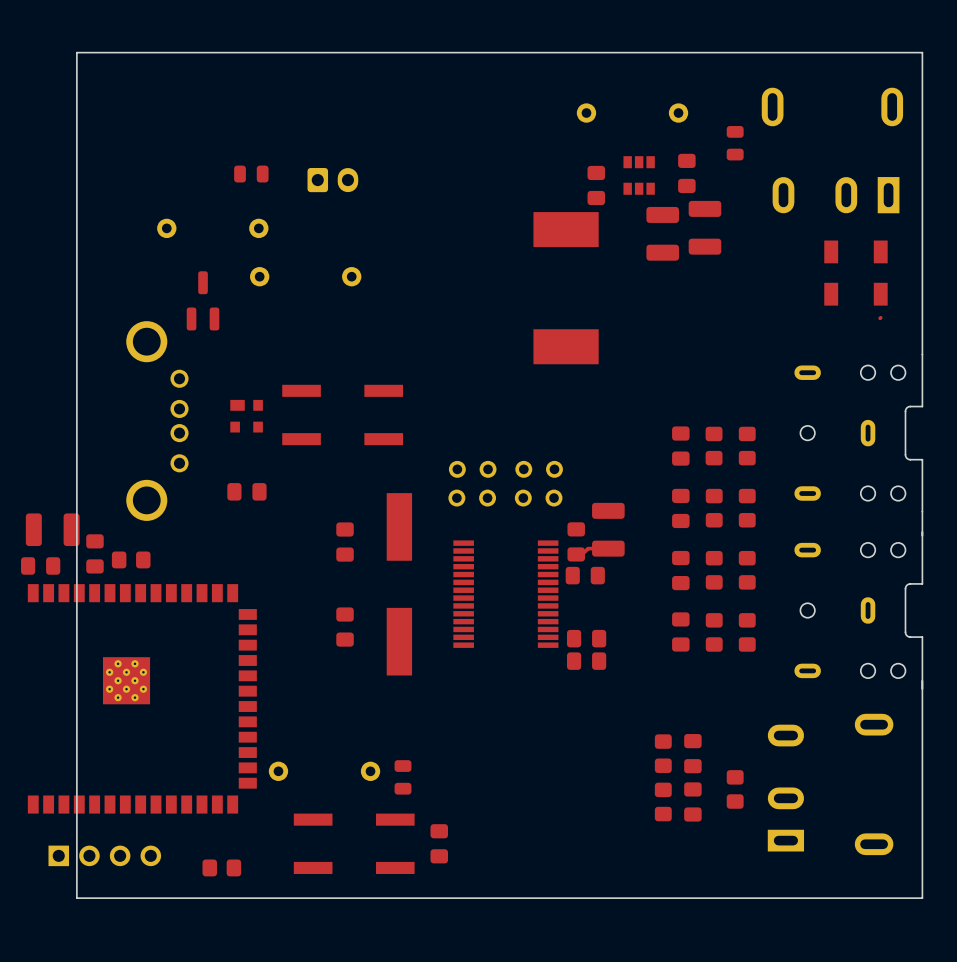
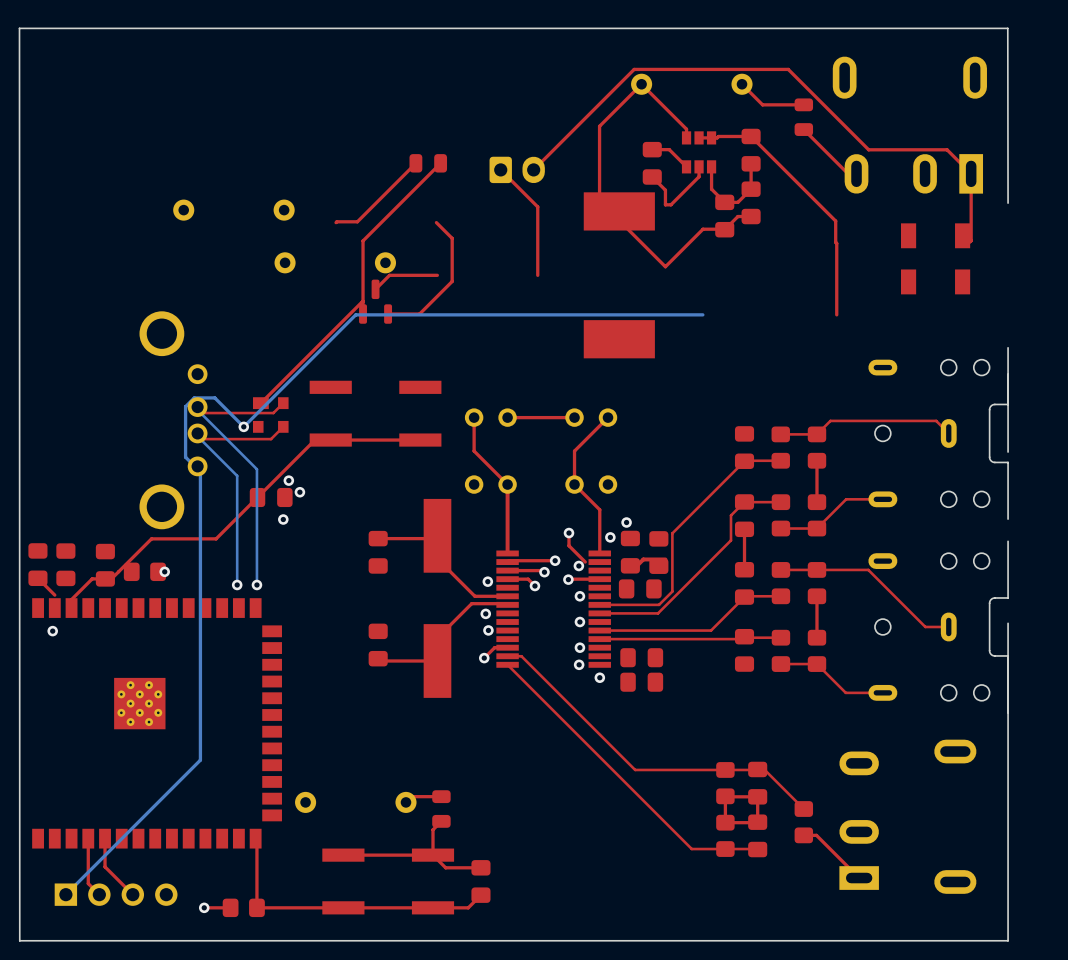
top track: none -> (742, 84) (762, 104) (803, 104)
top track: none -> (803, 129) (848, 173) (856, 173)
top track: none -> (686, 137) (686, 129) (641, 84) (599, 126) (599, 200) (665, 266) (703, 229) (724, 229) (737, 216) (751, 216)
top track: none -> (699, 137) (751, 136) (835, 221) (836, 314)
top track: none -> (652, 149) (669, 149) (686, 166)
part position: (251, 174) -> (428, 163)
part position: (332, 180) -> (517, 169)
top track: none -> (415, 163) (357, 221) (336, 222)
top track: none -> (440, 163) (363, 240) (363, 314)
top track: none -> (751, 163) (751, 189) (737, 202) (724, 202) (711, 189) (711, 166)
top track: none -> (699, 166) (699, 176) (670, 204) (665, 204) (665, 190) (652, 176)
top track: none -> (500, 169) (537, 206) (537, 275)
top track: none -> (533, 169) (634, 69) (788, 69) (868, 149) (947, 149) (971, 173) (971, 240) (969, 242)
part footprint: [646, 206, 680, 261] -> [715, 194, 735, 238]
part: none -> (751, 202)
part: (704, 227) -> none
top track: none -> (436, 222) (452, 238) (452, 281) (419, 314) (388, 314)
top track: none -> (437, 275) (389, 275) (375, 289)
part: (203, 300) -> none
top track: none -> (363, 301) (260, 403)
part: none -> (375, 301)
top track: (880, 317) (880, 318) -> none
bottom track: none -> (702, 314) (355, 314) (243, 426) (214, 397) (194, 397) (185, 406) (185, 457) (200, 472) (200, 760) (65, 894)
board edge: (922, 354) (922, 52) (76, 52) (76, 898) -> (1008, 203) (1007, 28) (19, 28) (19, 940) (85, 940)
board edge: none -> (1008, 374) (1008, 452)
top track: none -> (283, 403) (273, 413) (200, 412)
bottom track: none -> (200, 412) (256, 469) (256, 584)
top track: none -> (474, 417) (474, 451) (507, 484) (507, 553)
part: none -> (490, 417)
top track: none -> (574, 417) (507, 417)
part: none -> (591, 417)
top track: none -> (607, 417) (574, 451) (574, 484) (599, 509) (599, 553)
via: none -> (243, 426)
top track: none -> (283, 426) (271, 439) (200, 439)
top track: none -> (948, 433) (936, 420) (830, 420) (816, 434) (780, 434)
bottom track: none -> (200, 439) (237, 475) (237, 584)
top track: none -> (420, 440) (314, 440) (216, 538) (151, 538) (111, 578) (92, 578) (71, 599) (71, 608)
top track: none -> (780, 460) (745, 460) (672, 533) (672, 591) (659, 604) (599, 604)
top track: none -> (816, 460) (816, 502)
part: (472, 469) -> none
part: (539, 469) -> none
via: none -> (288, 480)
part: none -> (490, 484)
part: none -> (591, 484)
via: none -> (299, 492)
top track: none -> (882, 499) (846, 499) (816, 528) (780, 528)
top track: none -> (780, 502) (744, 501) (730, 515) (730, 540) (657, 613) (599, 613)
part: (472, 498) -> none
part: (538, 498) -> none
via: none -> (283, 519)
board edge: (922, 511) (922, 535) -> none
via: none -> (626, 522)
top track: none -> (744, 529) (744, 569)
top track: none -> (568, 533) (568, 545) (585, 562)
via: none -> (568, 533)
via: none -> (610, 537)
part: (52, 529) -> none
top track: none -> (378, 538) (428, 538) (431, 535) (437, 535) (437, 558) (474, 596) (507, 596)
part: (608, 529) -> none
part: none -> (658, 552)
top track: none -> (555, 560) (507, 562)
via: none -> (555, 560)
part: none -> (37, 564)
part: none -> (65, 564)
via: none -> (578, 565)
top track: none -> (508, 569) (507, 570) (542, 570) (544, 572)
top track: none -> (780, 569) (868, 569) (925, 626) (948, 626)
via: none -> (164, 571)
via: none -> (544, 572)
top track: none -> (37, 578) (54, 595)
part: (40, 565) -> none
top track: none -> (507, 579) (528, 579) (534, 586)
top track: none -> (599, 579) (568, 579)
via: none -> (568, 579)
via: none -> (487, 581)
via: none -> (237, 584)
via: none -> (256, 584)
via: none -> (534, 586)
via: none -> (579, 596)
top track: none -> (780, 596) (745, 596) (711, 630) (599, 630)
top track: none -> (816, 596) (816, 637)
top track: none -> (507, 604) (471, 603) (437, 637) (437, 660) (380, 660) (378, 658)
via: none -> (485, 613)
via: none -> (579, 621)
board edge: none -> (1008, 623) (1008, 703)
via: none -> (488, 630)
via: none -> (52, 631)
top track: none -> (780, 637) (599, 639)
top track: none -> (507, 647) (494, 647) (484, 658)
via: none -> (579, 647)
top track: none -> (507, 656) (521, 656) (635, 769) (764, 769) (803, 809)
via: none -> (484, 658)
top track: none -> (780, 664) (816, 664) (845, 692) (882, 692)
top track: none -> (503, 664) (507, 664) (691, 849) (757, 849)
via: none -> (579, 664)
via: none -> (599, 677)
top track: none -> (725, 796) (725, 822) (757, 822) (757, 796) (725, 796)
top track: none -> (441, 796) (411, 796) (405, 802)
top track: none -> (441, 821) (433, 829) (433, 855)
top track: none -> (803, 835) (816, 835) (859, 878)
top track: none -> (88, 838) (88, 883) (99, 894)
top track: none -> (105, 838) (105, 866) (132, 894)
top track: none -> (255, 838) (256, 907) (468, 907) (480, 895)
top track: none -> (433, 855) (445, 867) (480, 867)
top track: none -> (433, 855) (343, 855)
via: none -> (204, 907)
top track: none -> (230, 907) (204, 907)

